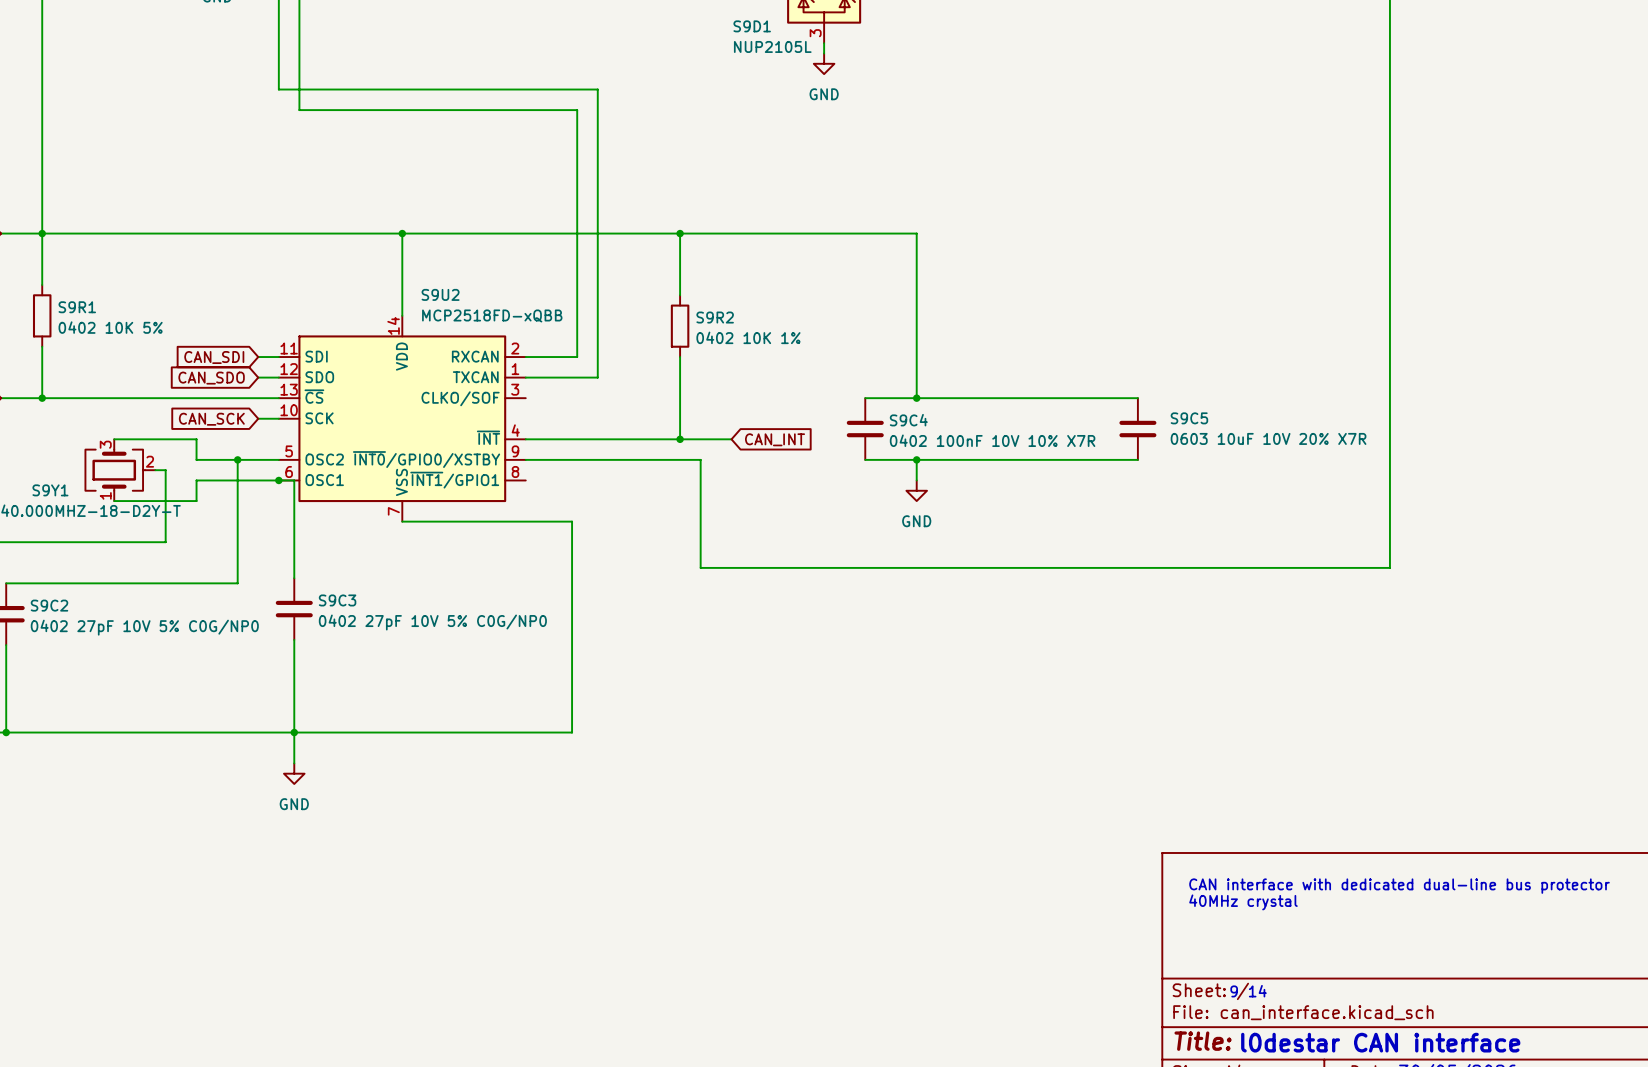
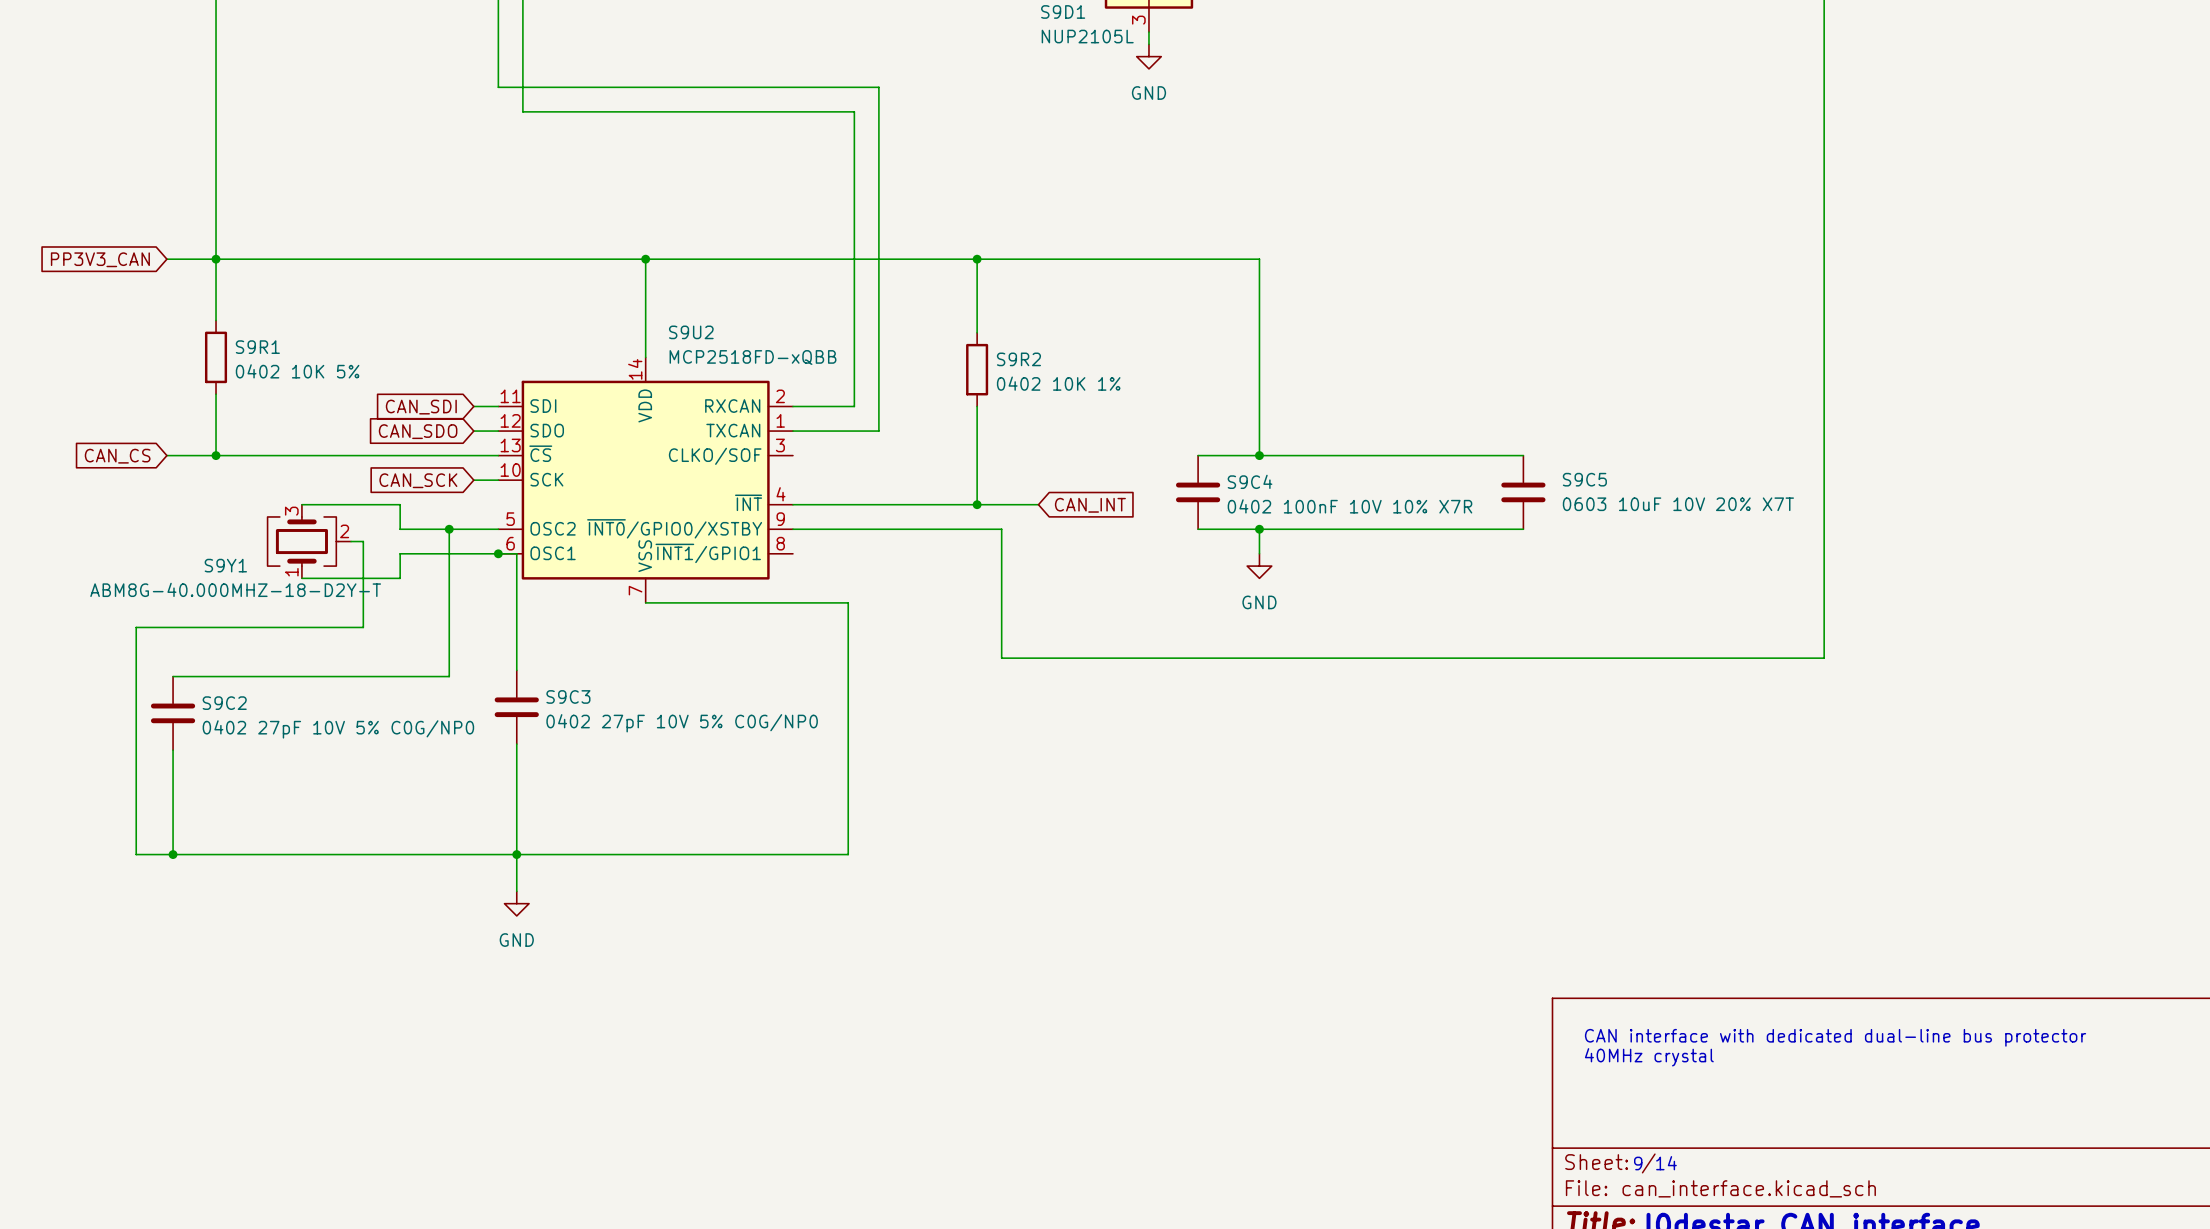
S9C5 value: 0603 10uF 10V 20% X7R (1268, 438) -> 0603 10uF 10V 20% X7T (1678, 504)

